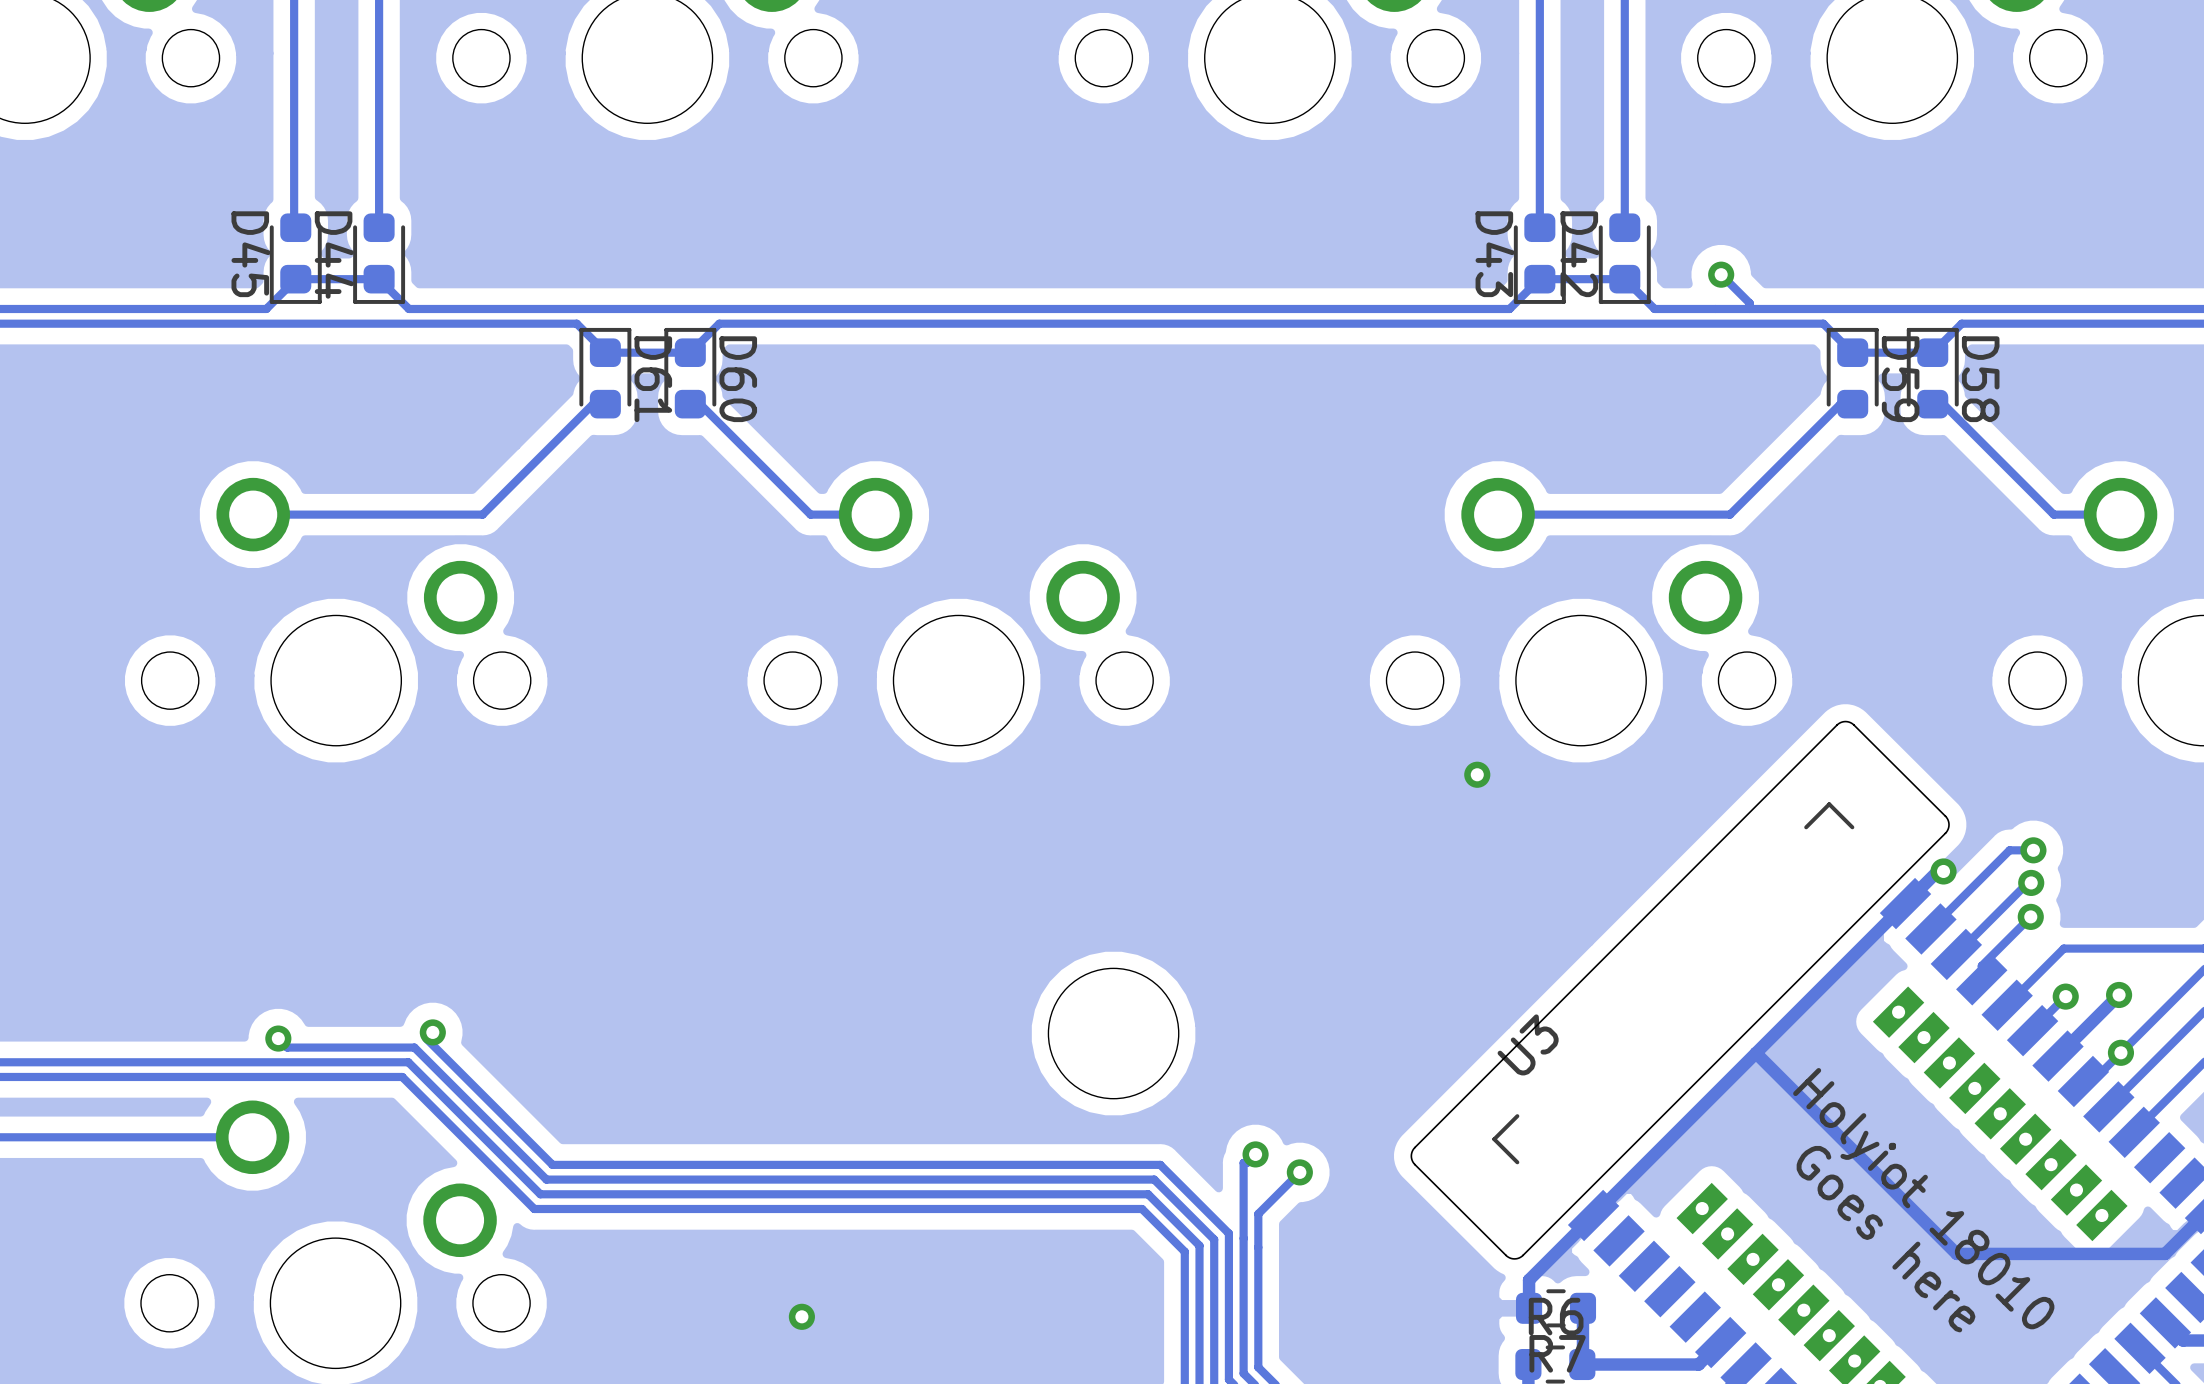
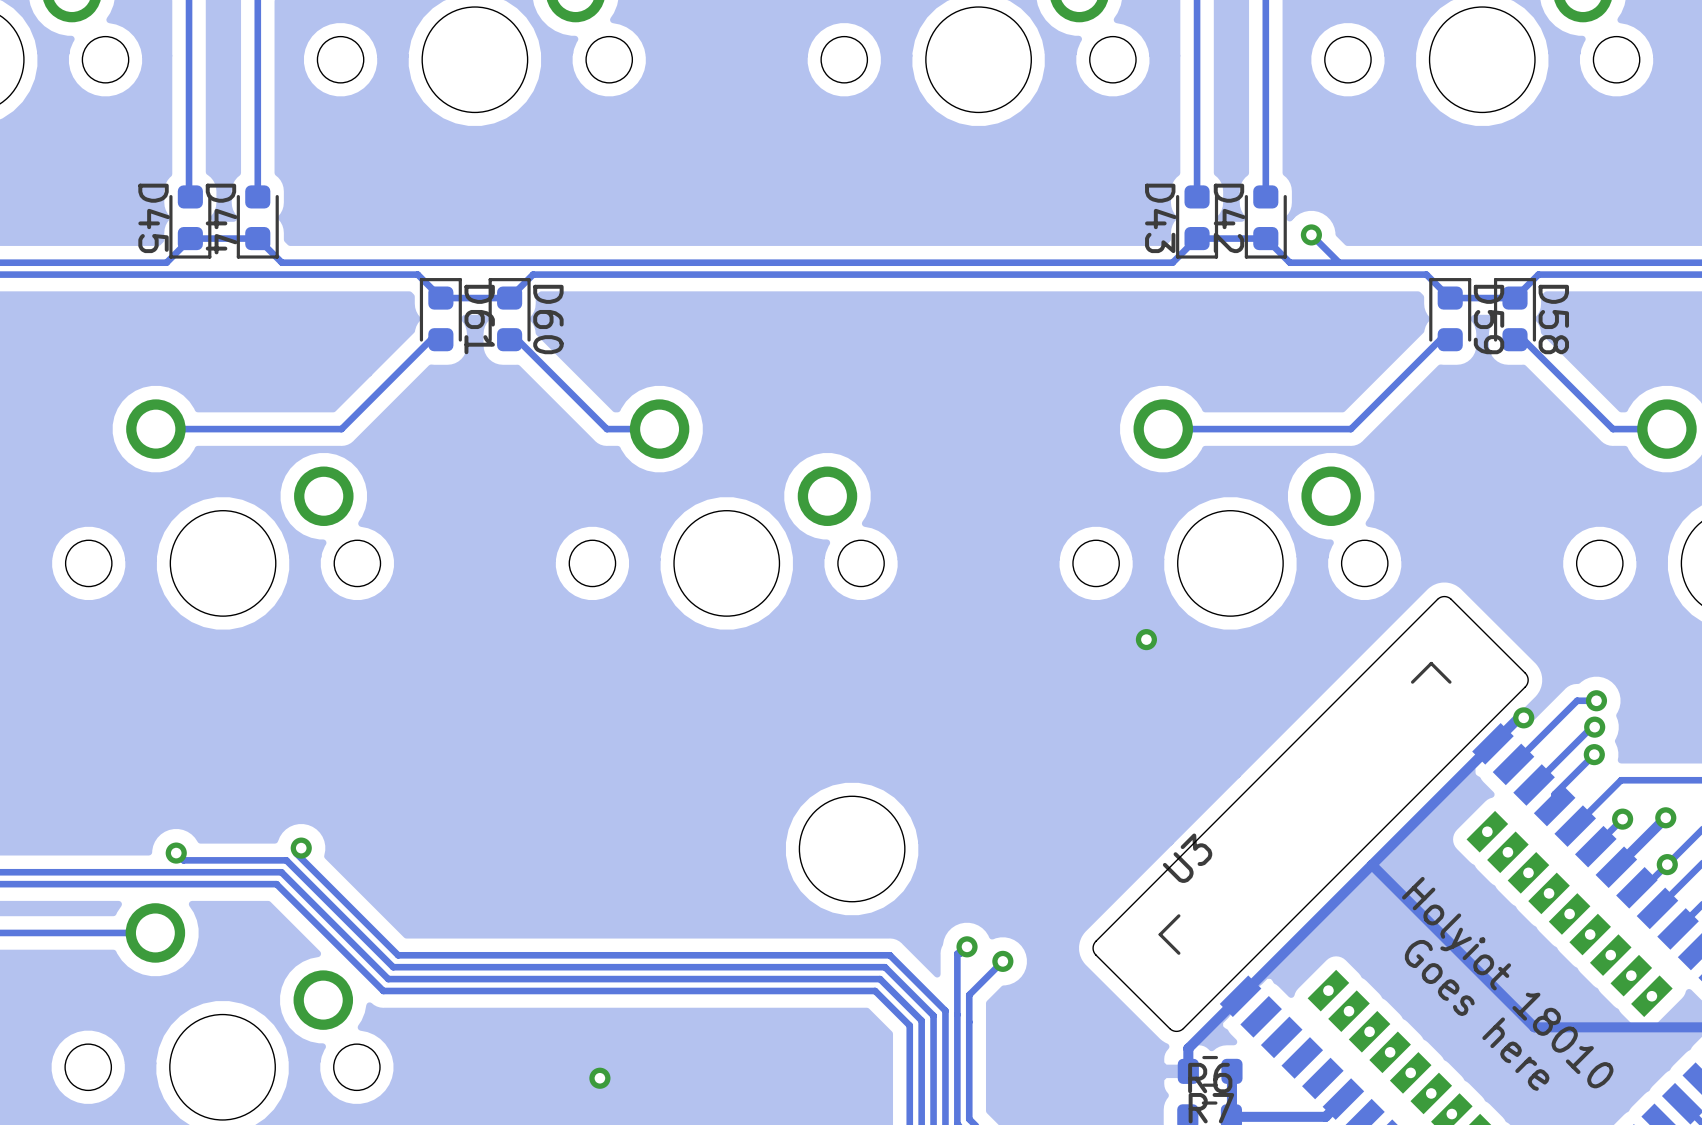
track: none -> (1311, 234) (1339, 262)
track: (1721, 274) (1749, 303) (1749, 308) -> none
via position: (1721, 274) -> (1311, 234)

